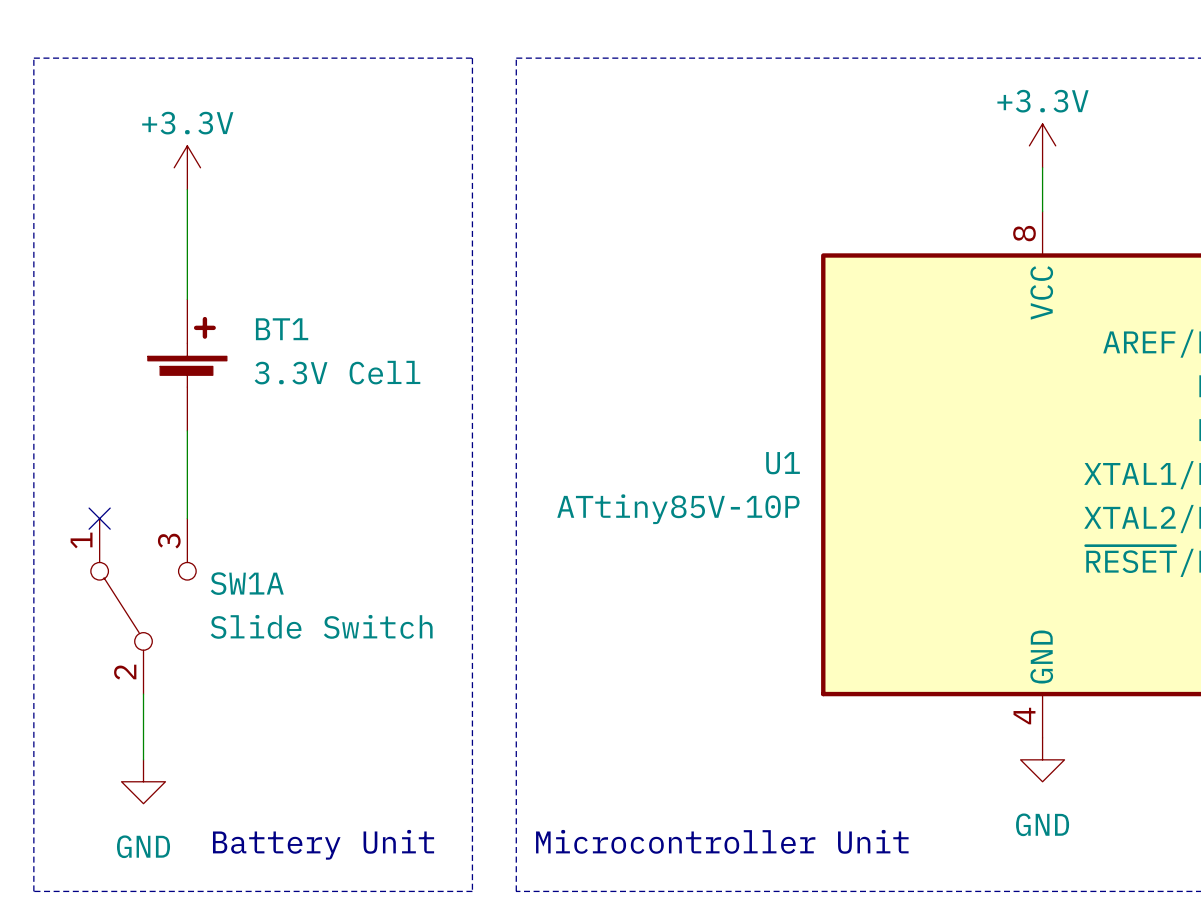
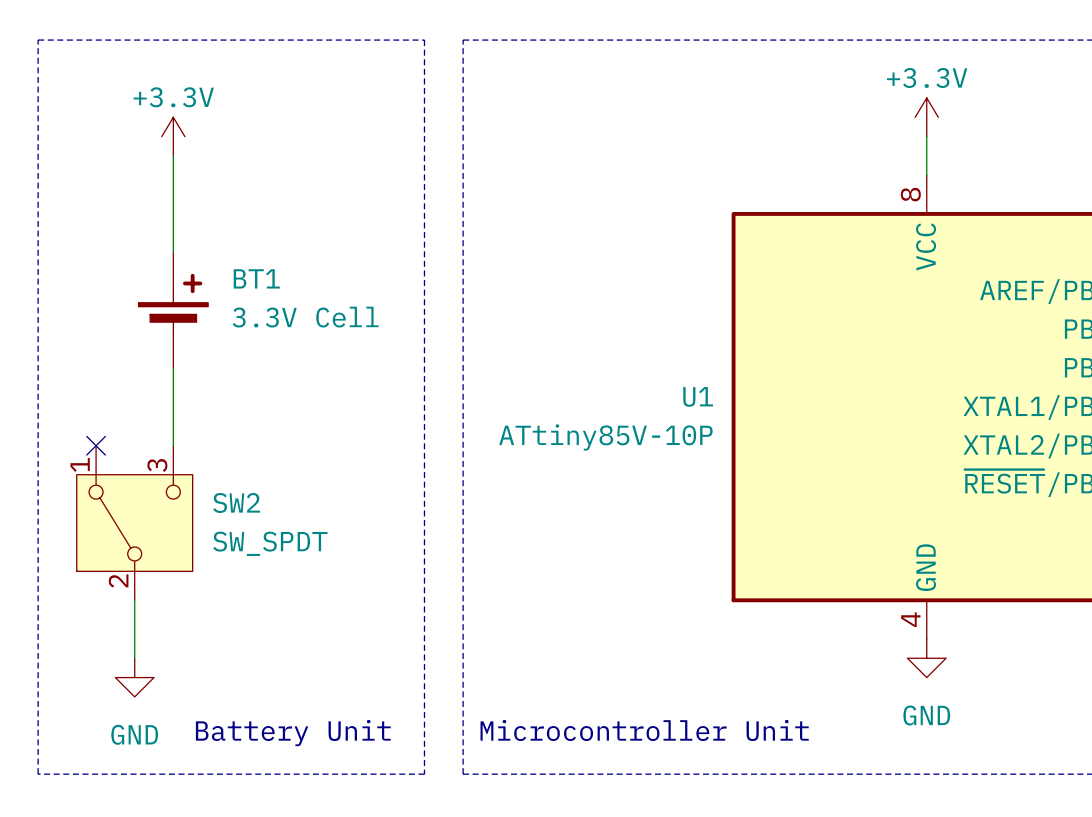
BT1 symbol: [147, 299, 227, 431] -> [138, 252, 209, 369]
SW1A: Slide Switch (143, 606) -> none
SW2: none -> SW_SPDT (134, 523)

